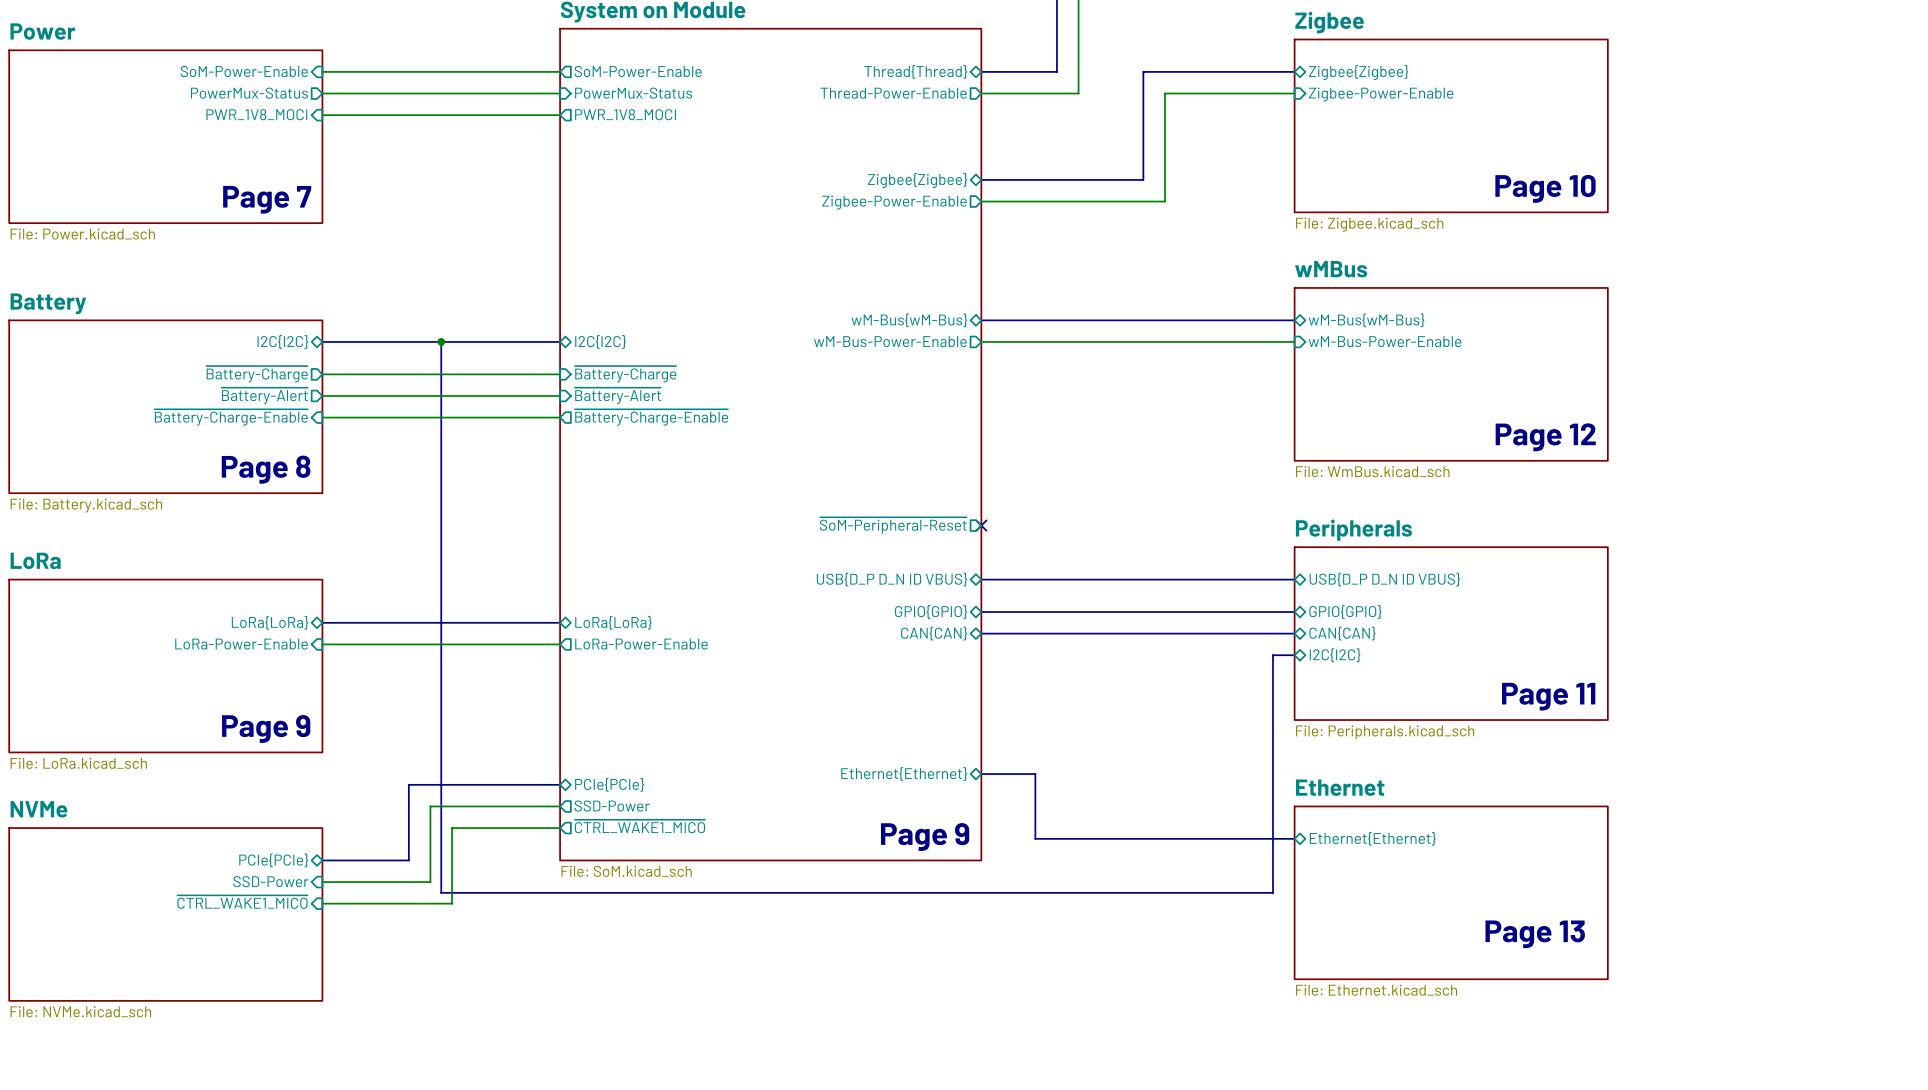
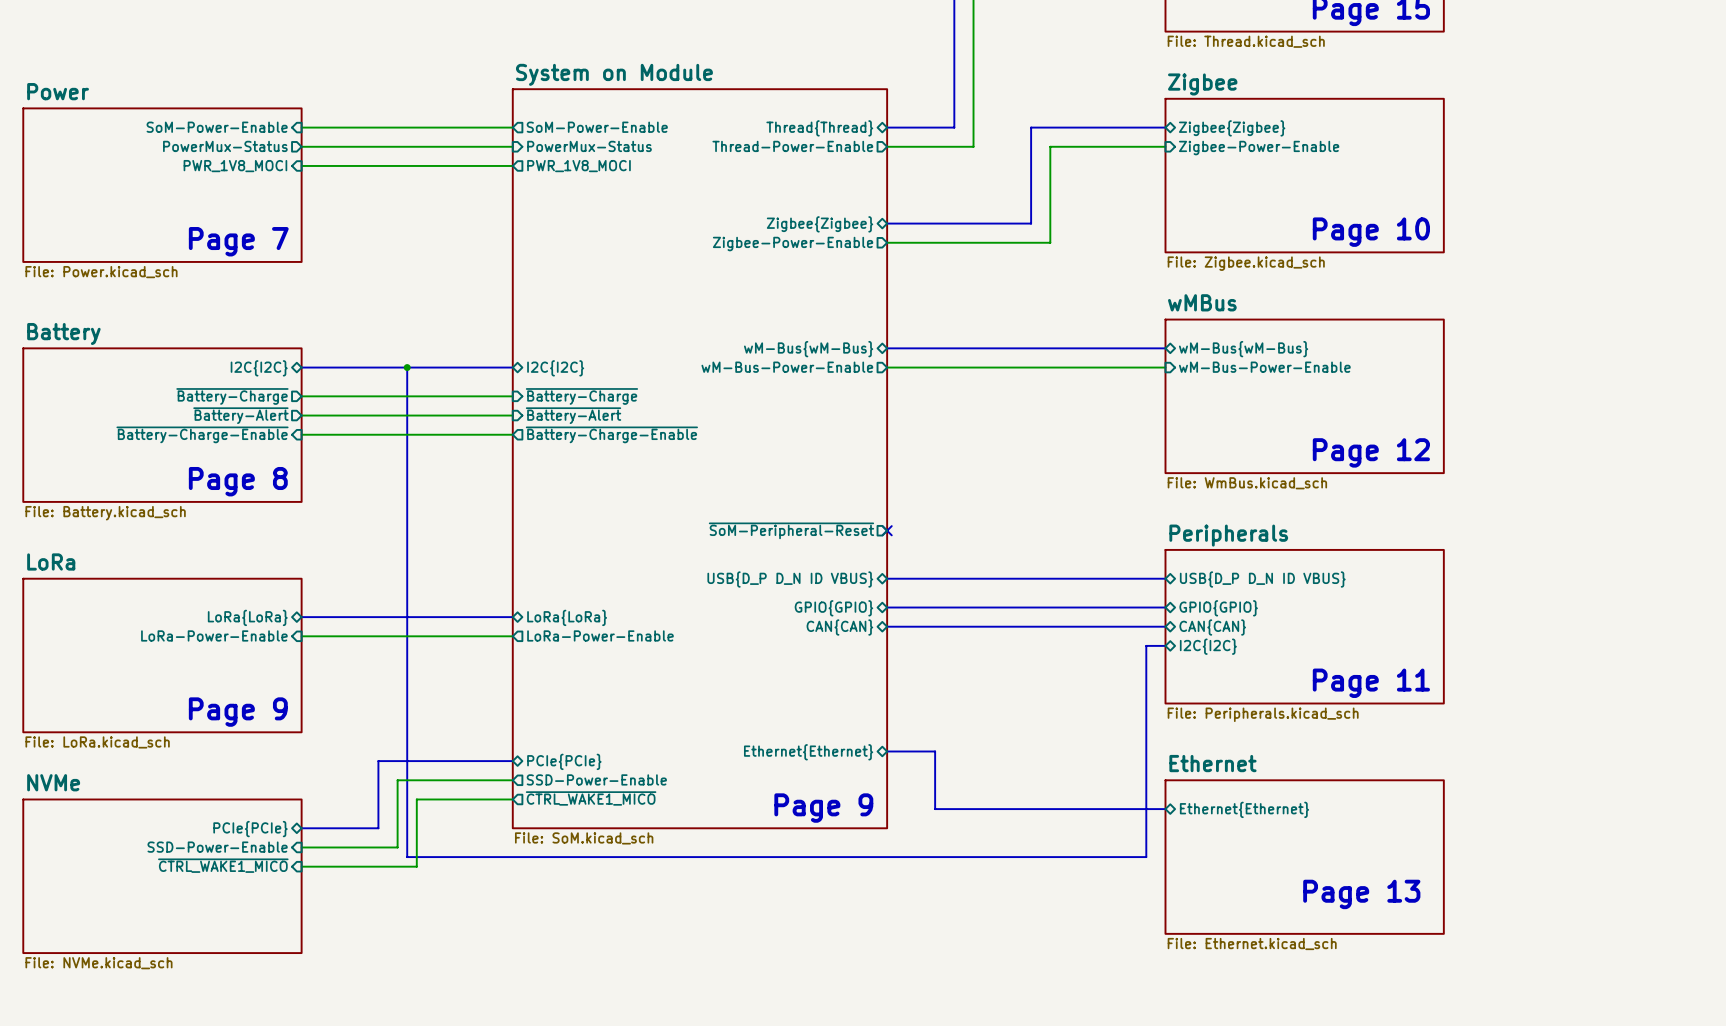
sheet pin: SSD-Power (612, 806) -> SSD-Power-Enable (596, 779)
sheet pin: SSD-Power (270, 881) -> SSD-Power-Enable (217, 847)

